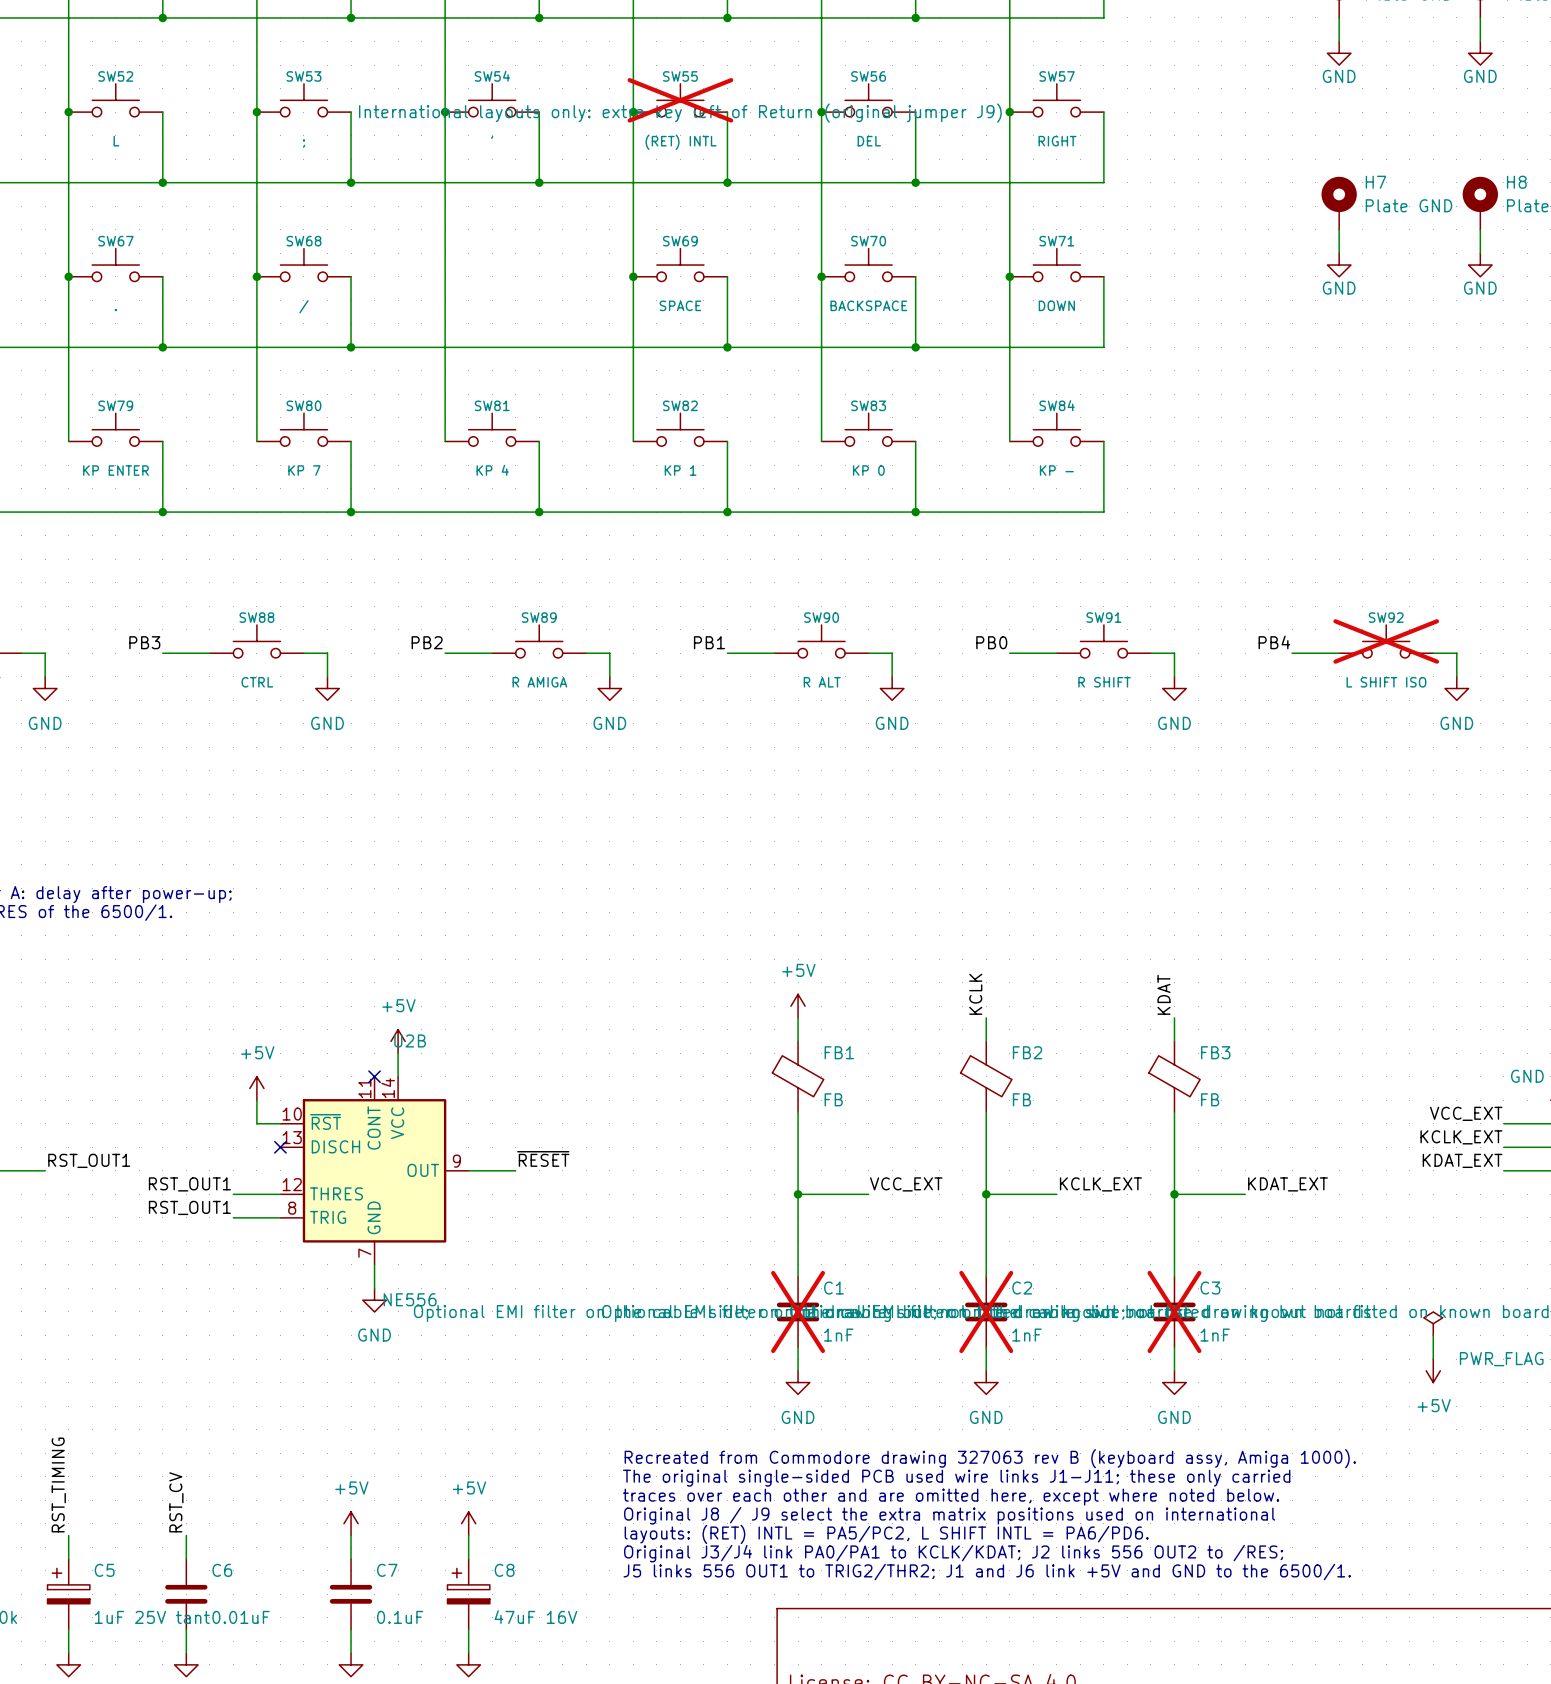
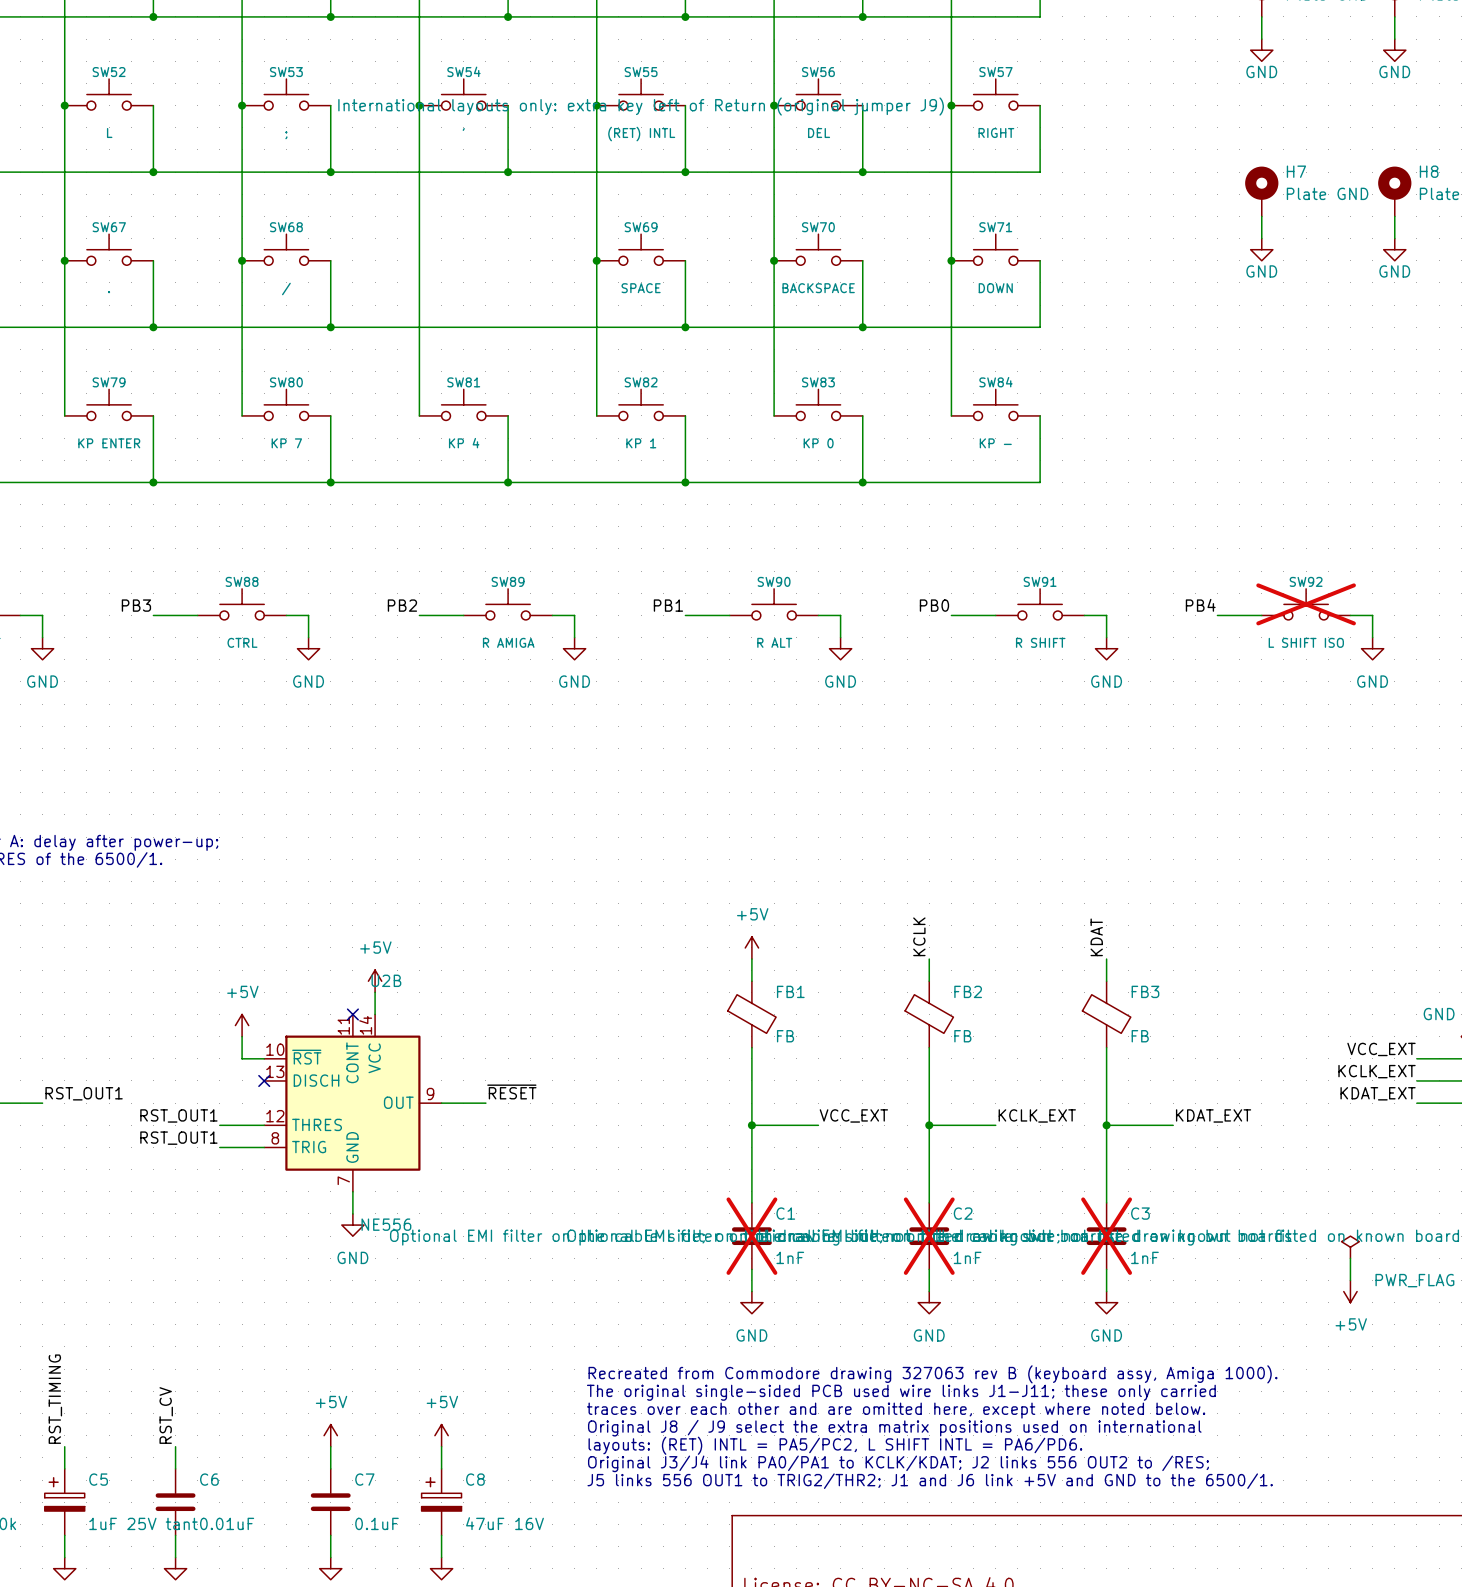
SW55 do-not-place cross: (680, 100) -> none

